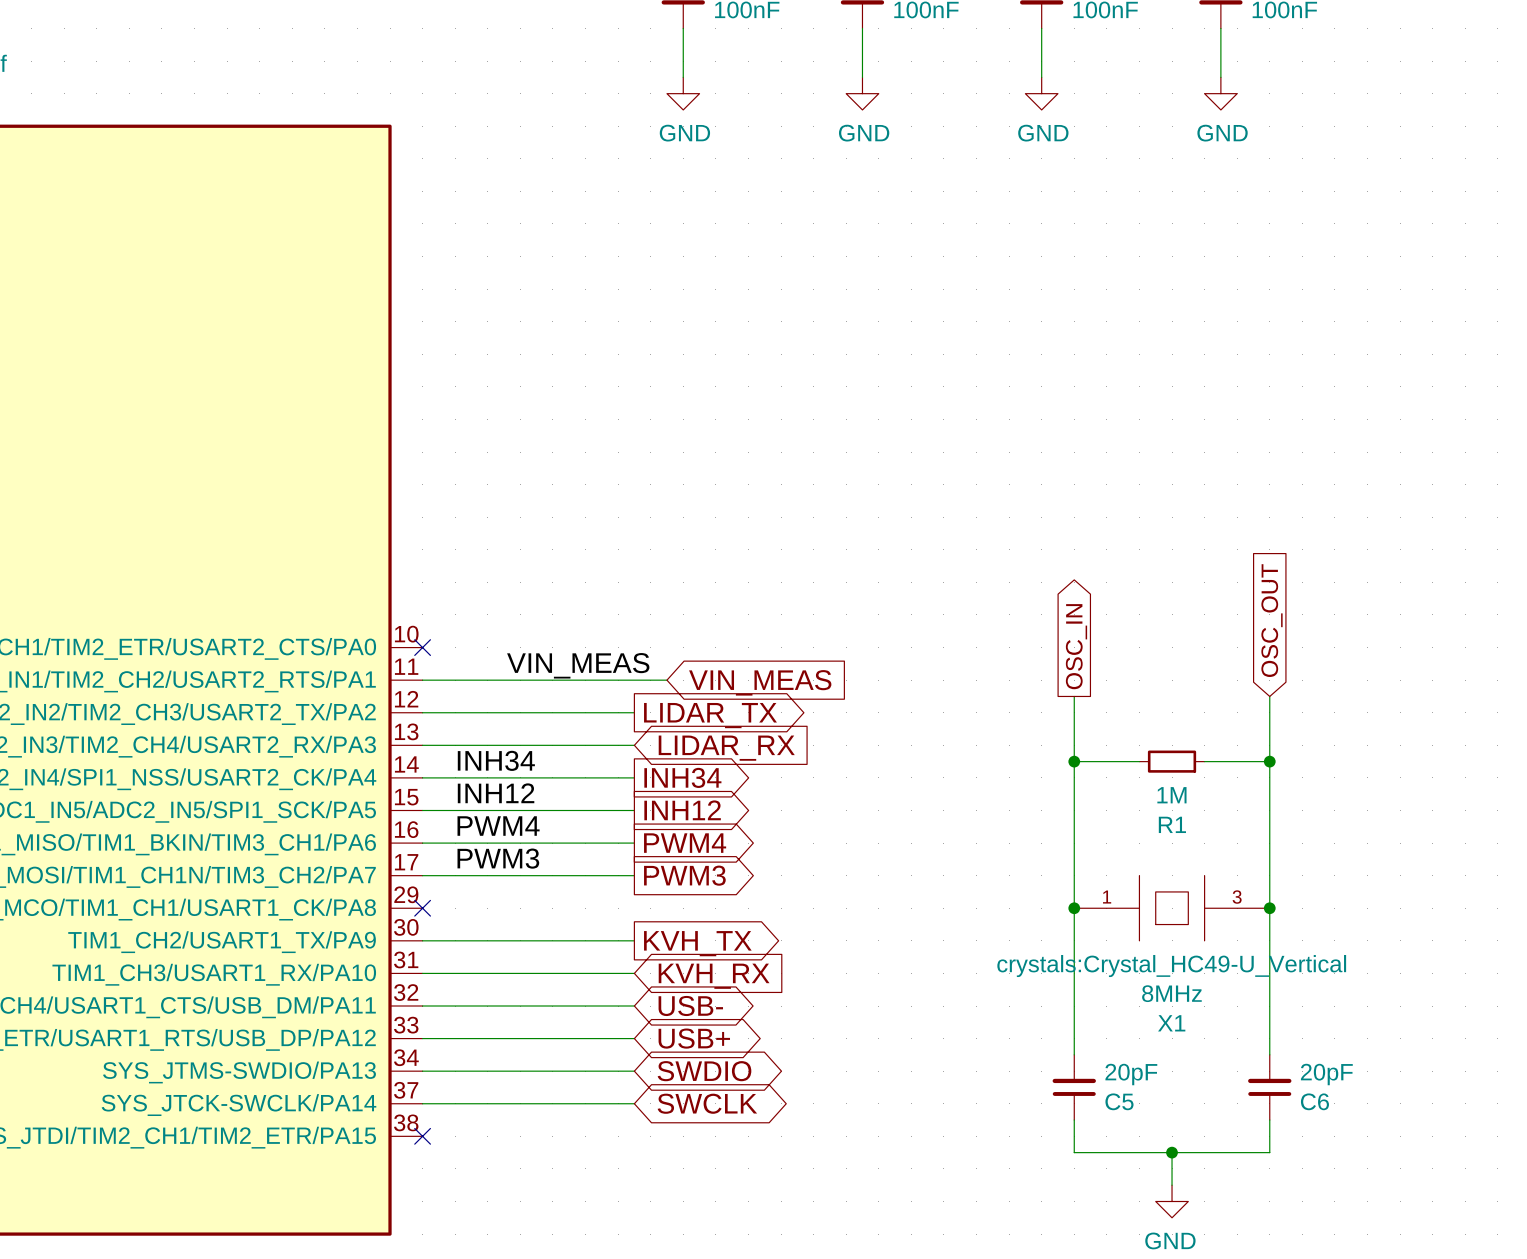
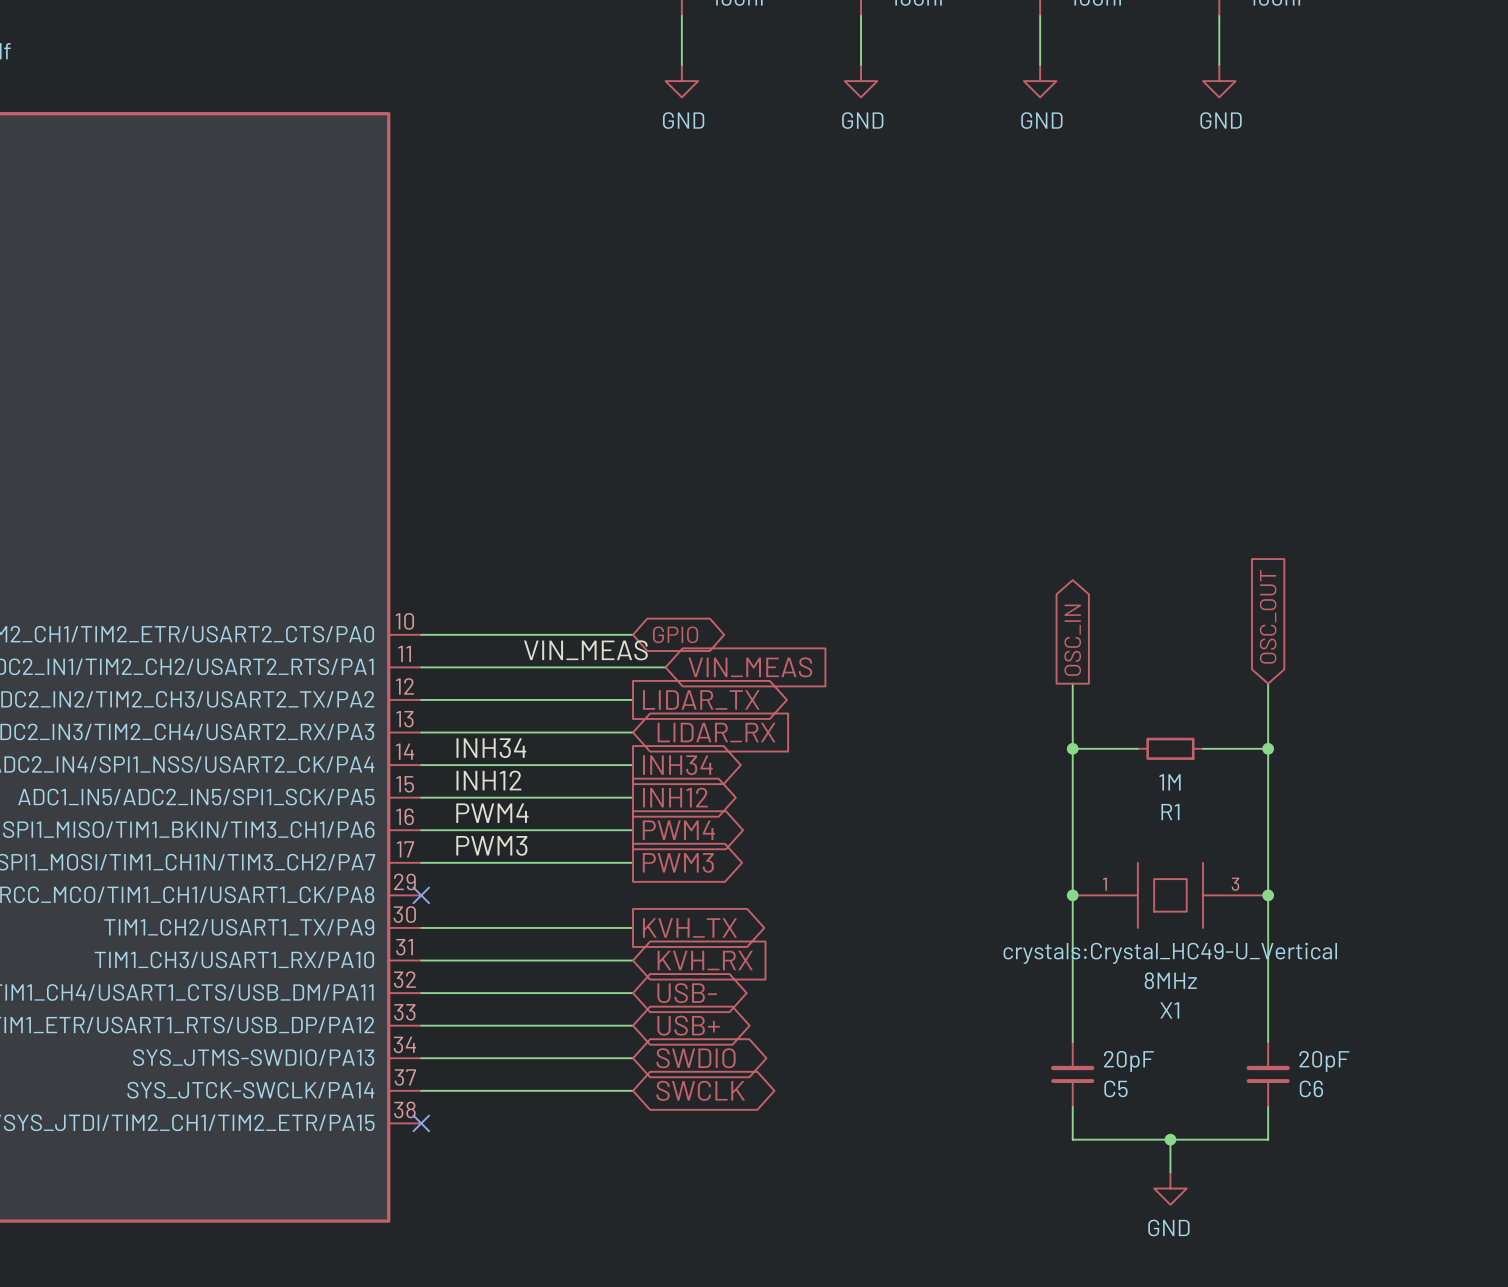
wire: none -> (421, 634) (633, 634)
no-connect mark: (422, 647) -> none
global label: none -> GPIO (675, 634)

